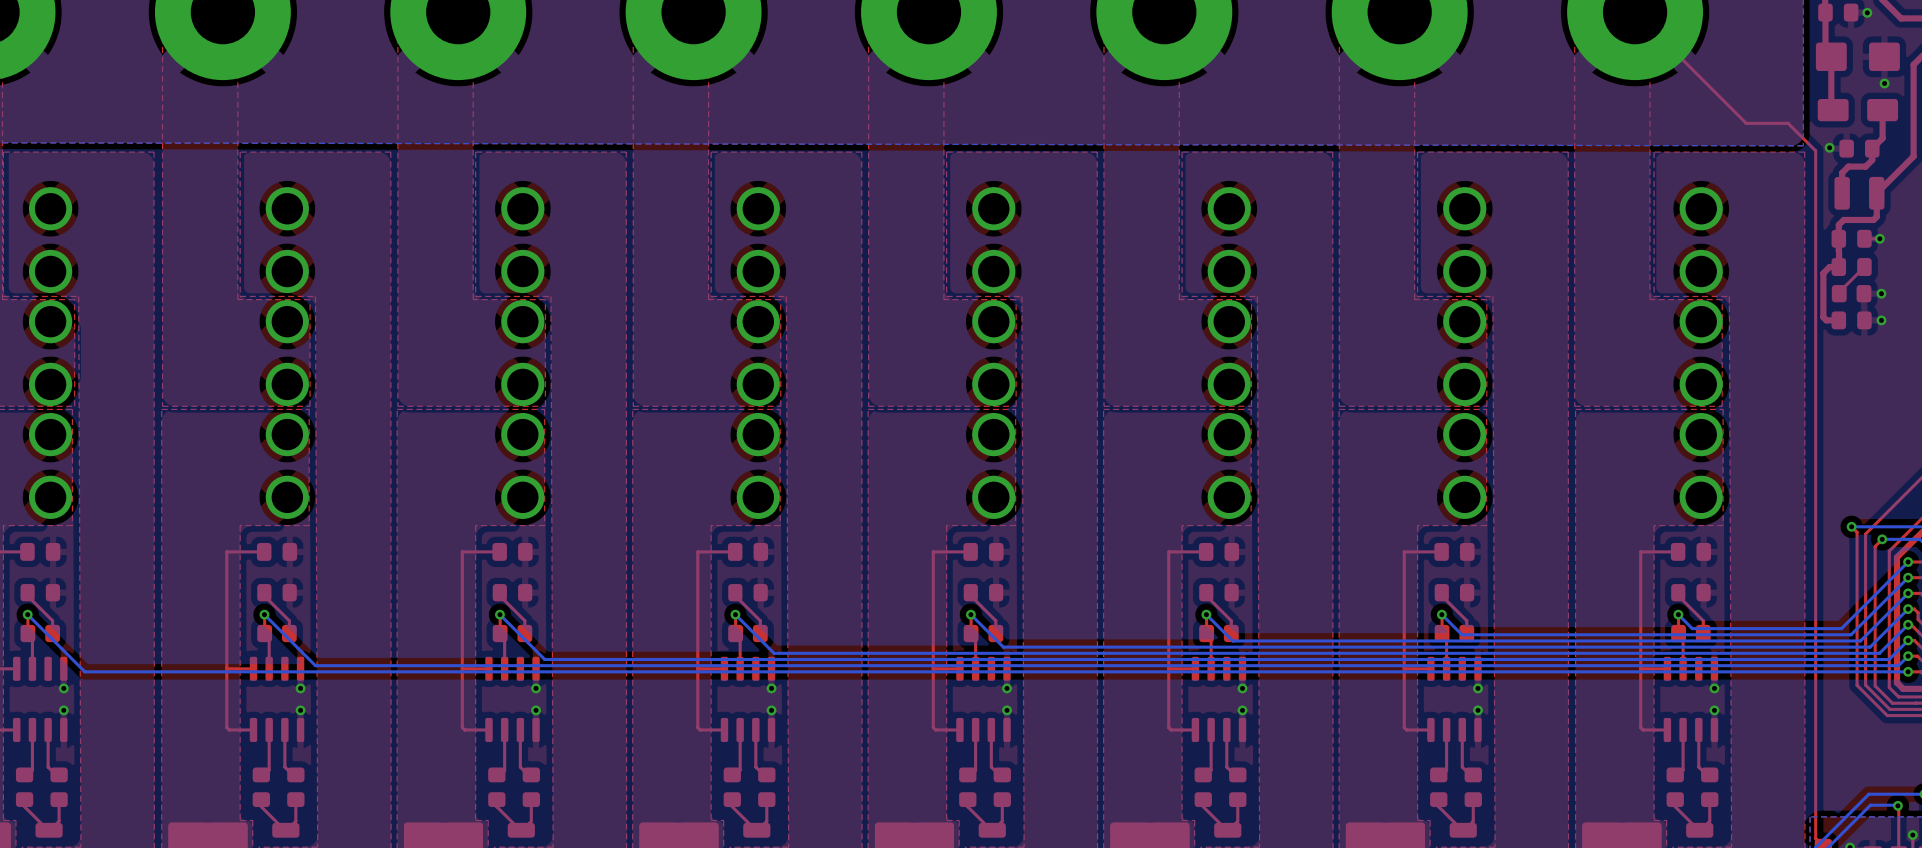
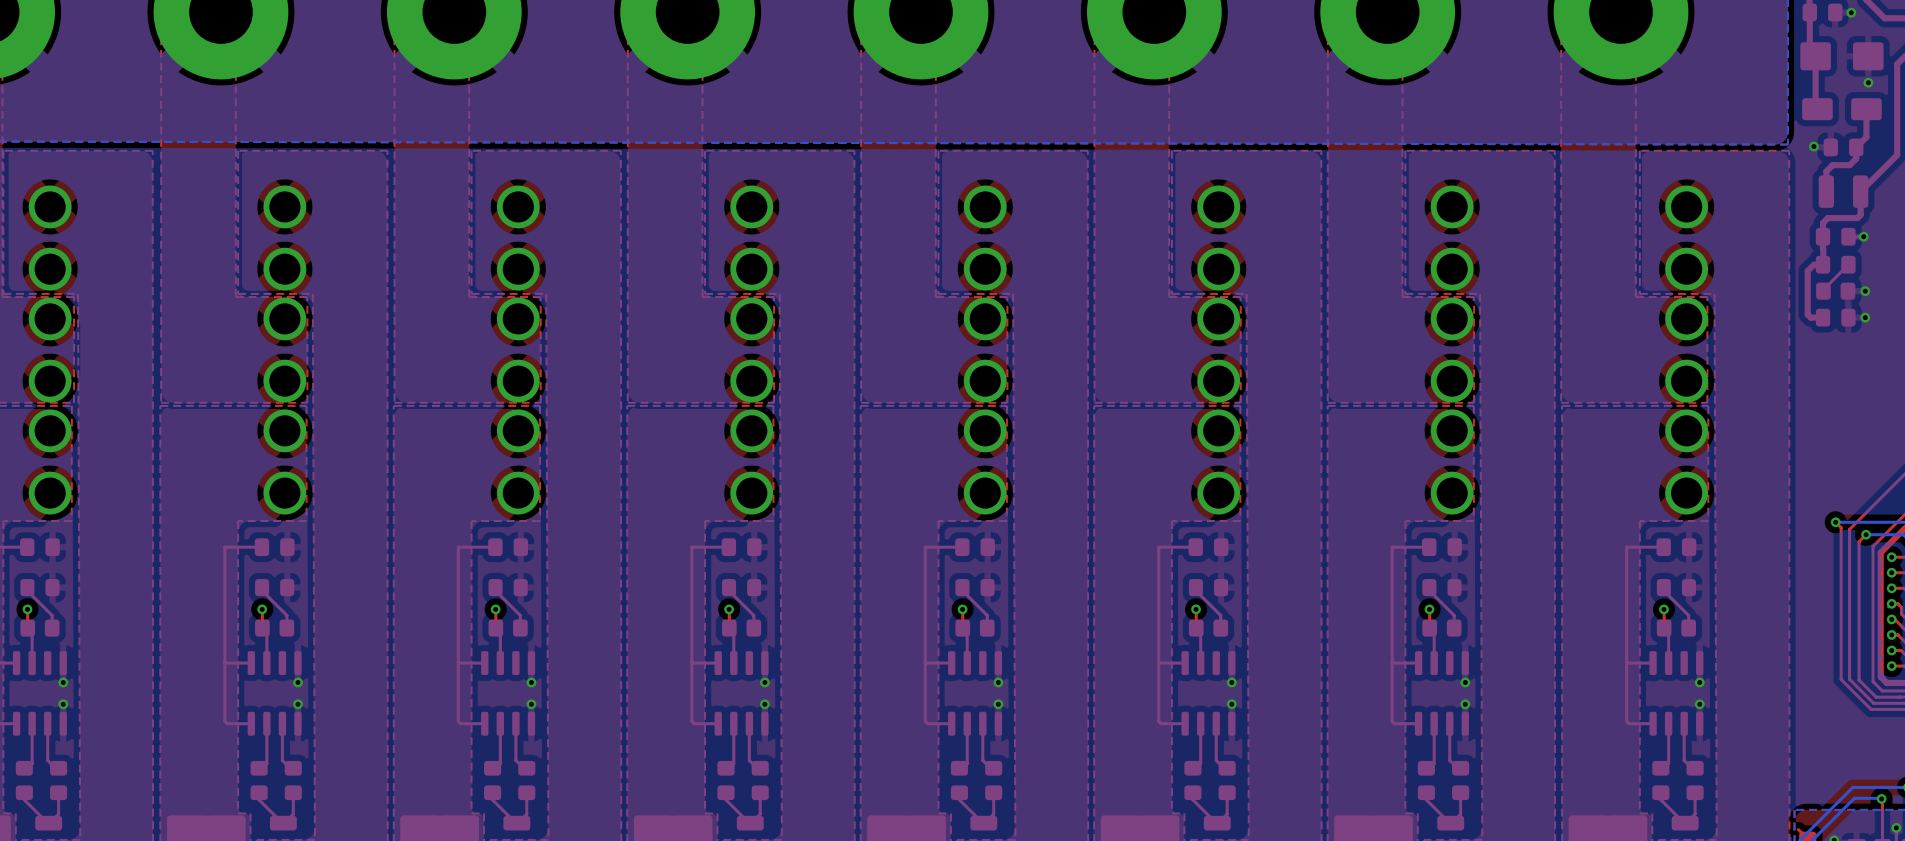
top track: (1635, 12) (1746, 123) (1788, 123) (1815, 150) (1815, 838) -> (1798, 829) (1800, 831)
bottom track: (1908, 562) (1841, 628) (1692, 628) (1678, 614) -> none
bottom track: (1908, 577) (1851, 634) (1462, 634) (1441, 614) -> none
bottom track: (1908, 593) (1860, 640) (1232, 640) (1206, 614) -> none
bottom track: (1904, 612) (1870, 647) (1003, 647) (970, 614) -> none
bottom track: (27, 614) (84, 671) (1908, 671) -> none
bottom track: (264, 614) (315, 665) (1898, 665) (1908, 656) -> none
bottom track: (499, 614) (544, 659) (1889, 659) (1908, 640) -> none
bottom track: (735, 614) (774, 653) (1879, 653) (1908, 624) -> none

